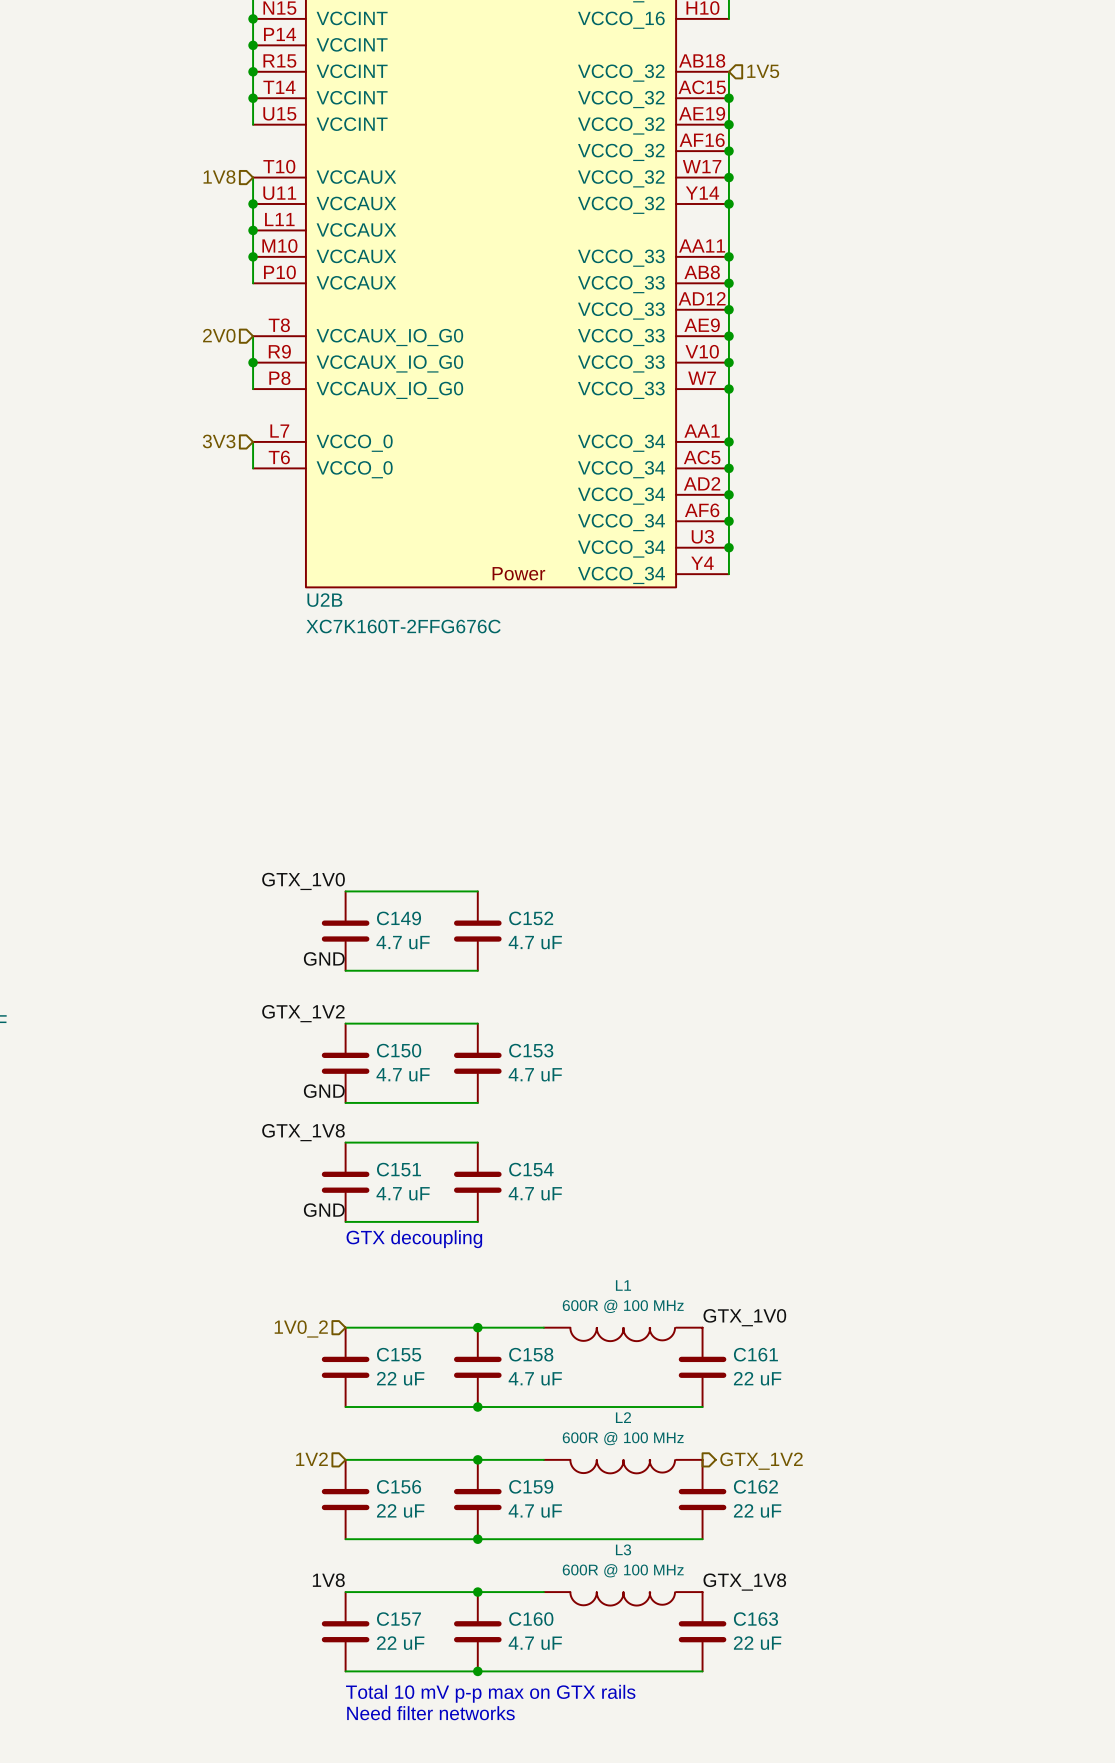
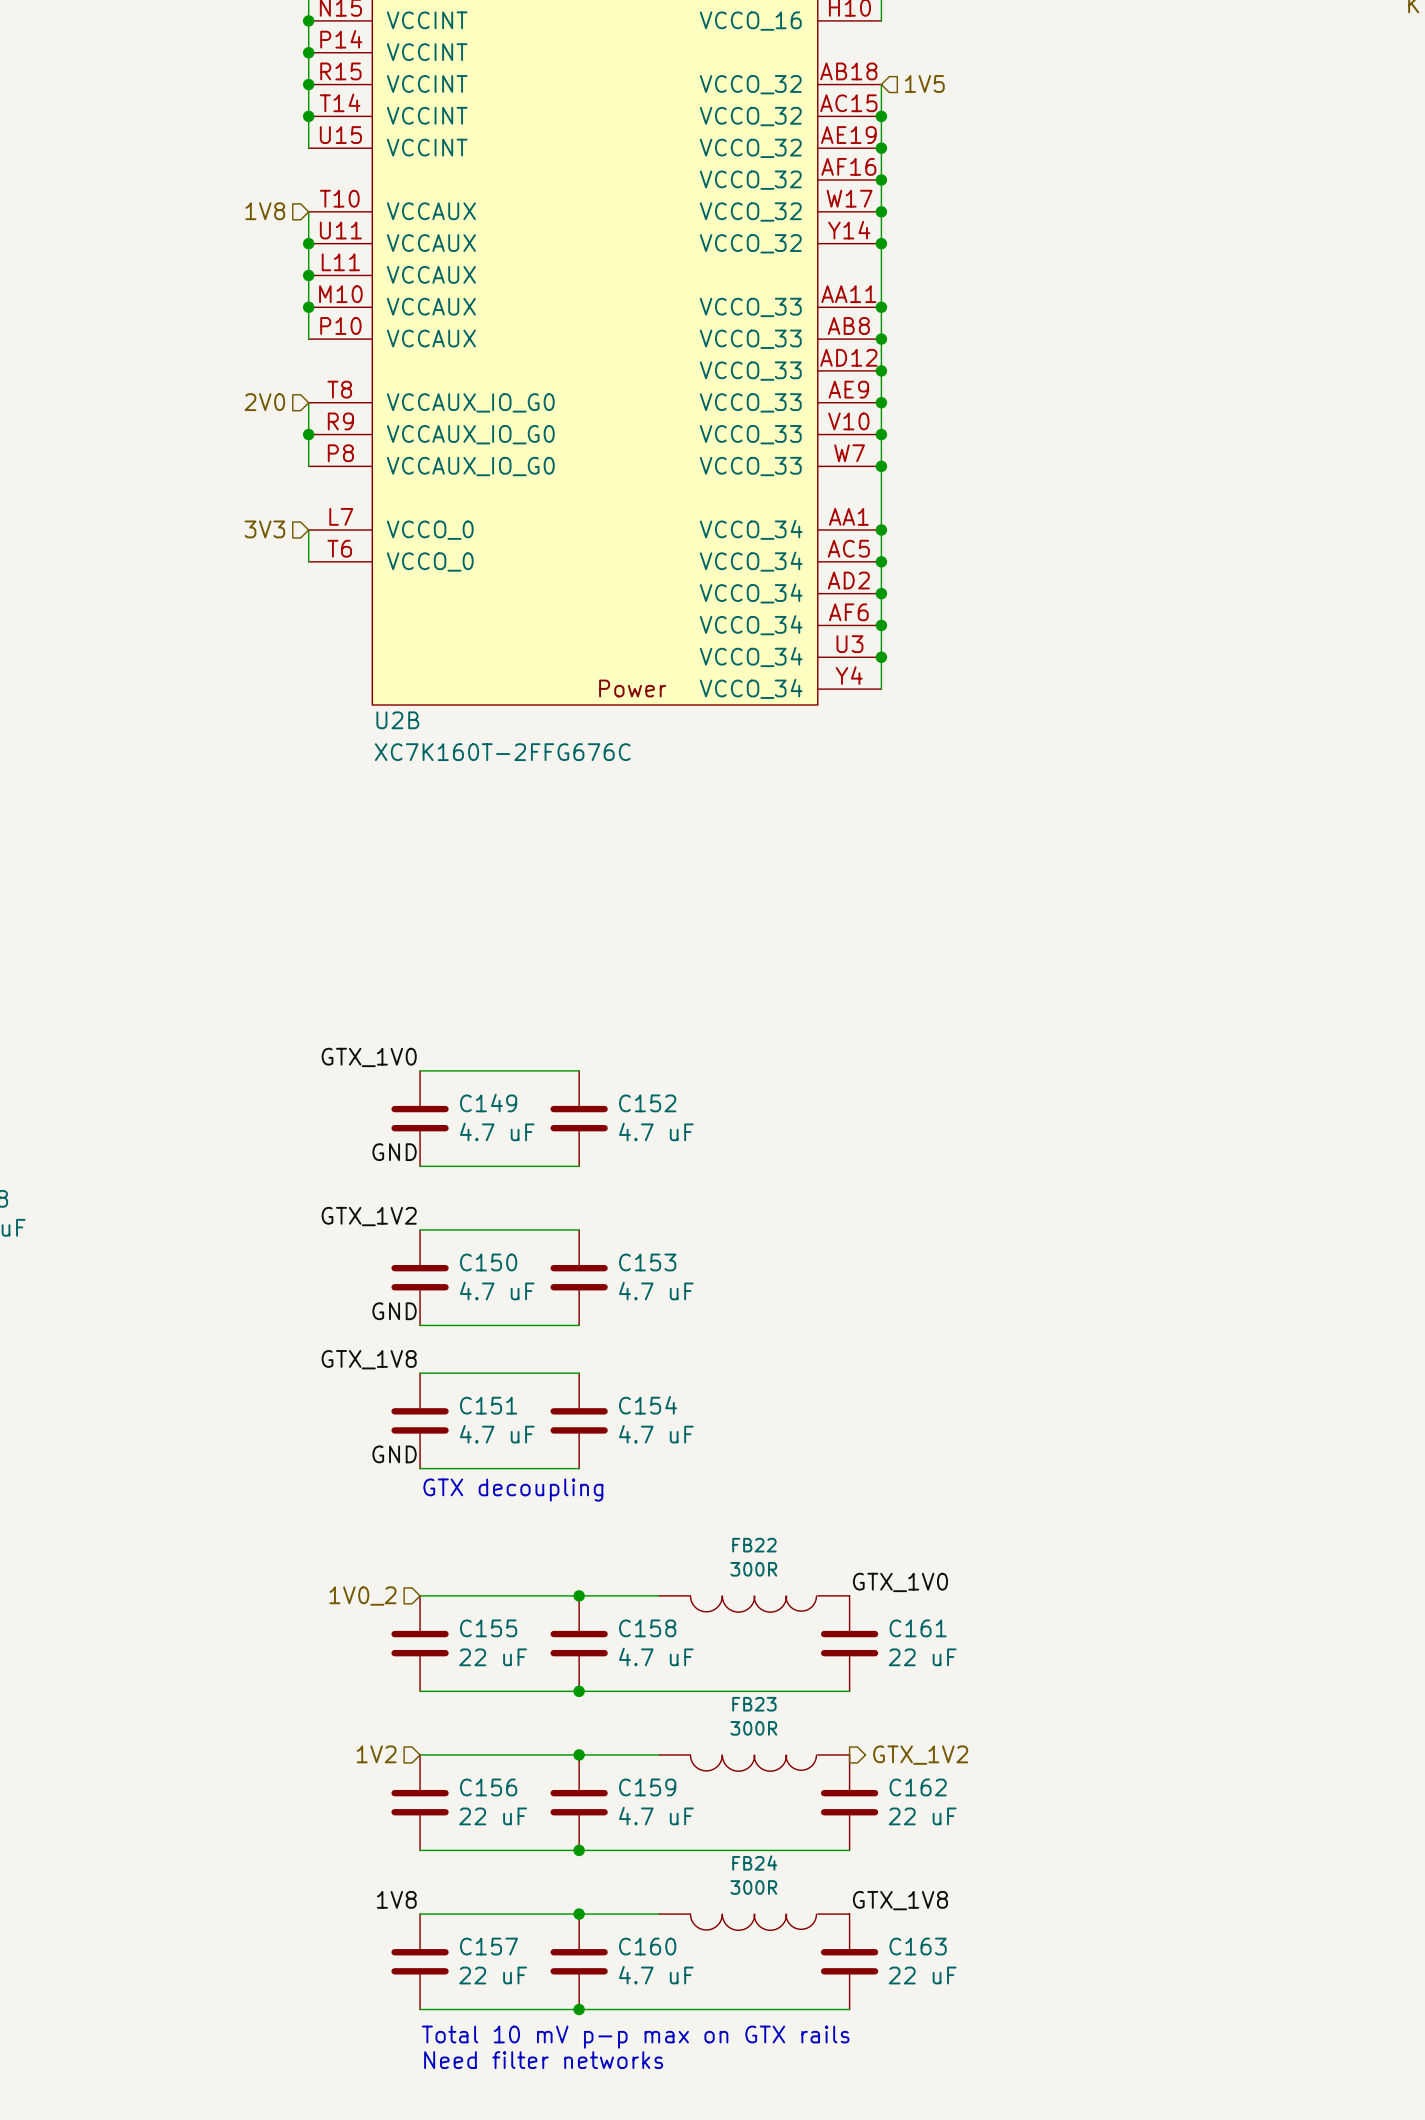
L1 name: L1 (623, 1285) -> FB22 (754, 1545)
L1 value: 600R @ 100 MHz (623, 1306) -> 300R (753, 1569)
L2 name: L2 (623, 1417) -> FB23 (754, 1704)
L2 value: 600R @ 100 MHz (623, 1438) -> 300R (753, 1728)
L3 name: L3 (623, 1549) -> FB24 (754, 1863)
L3 value: 600R @ 100 MHz (623, 1570) -> 300R (753, 1887)

